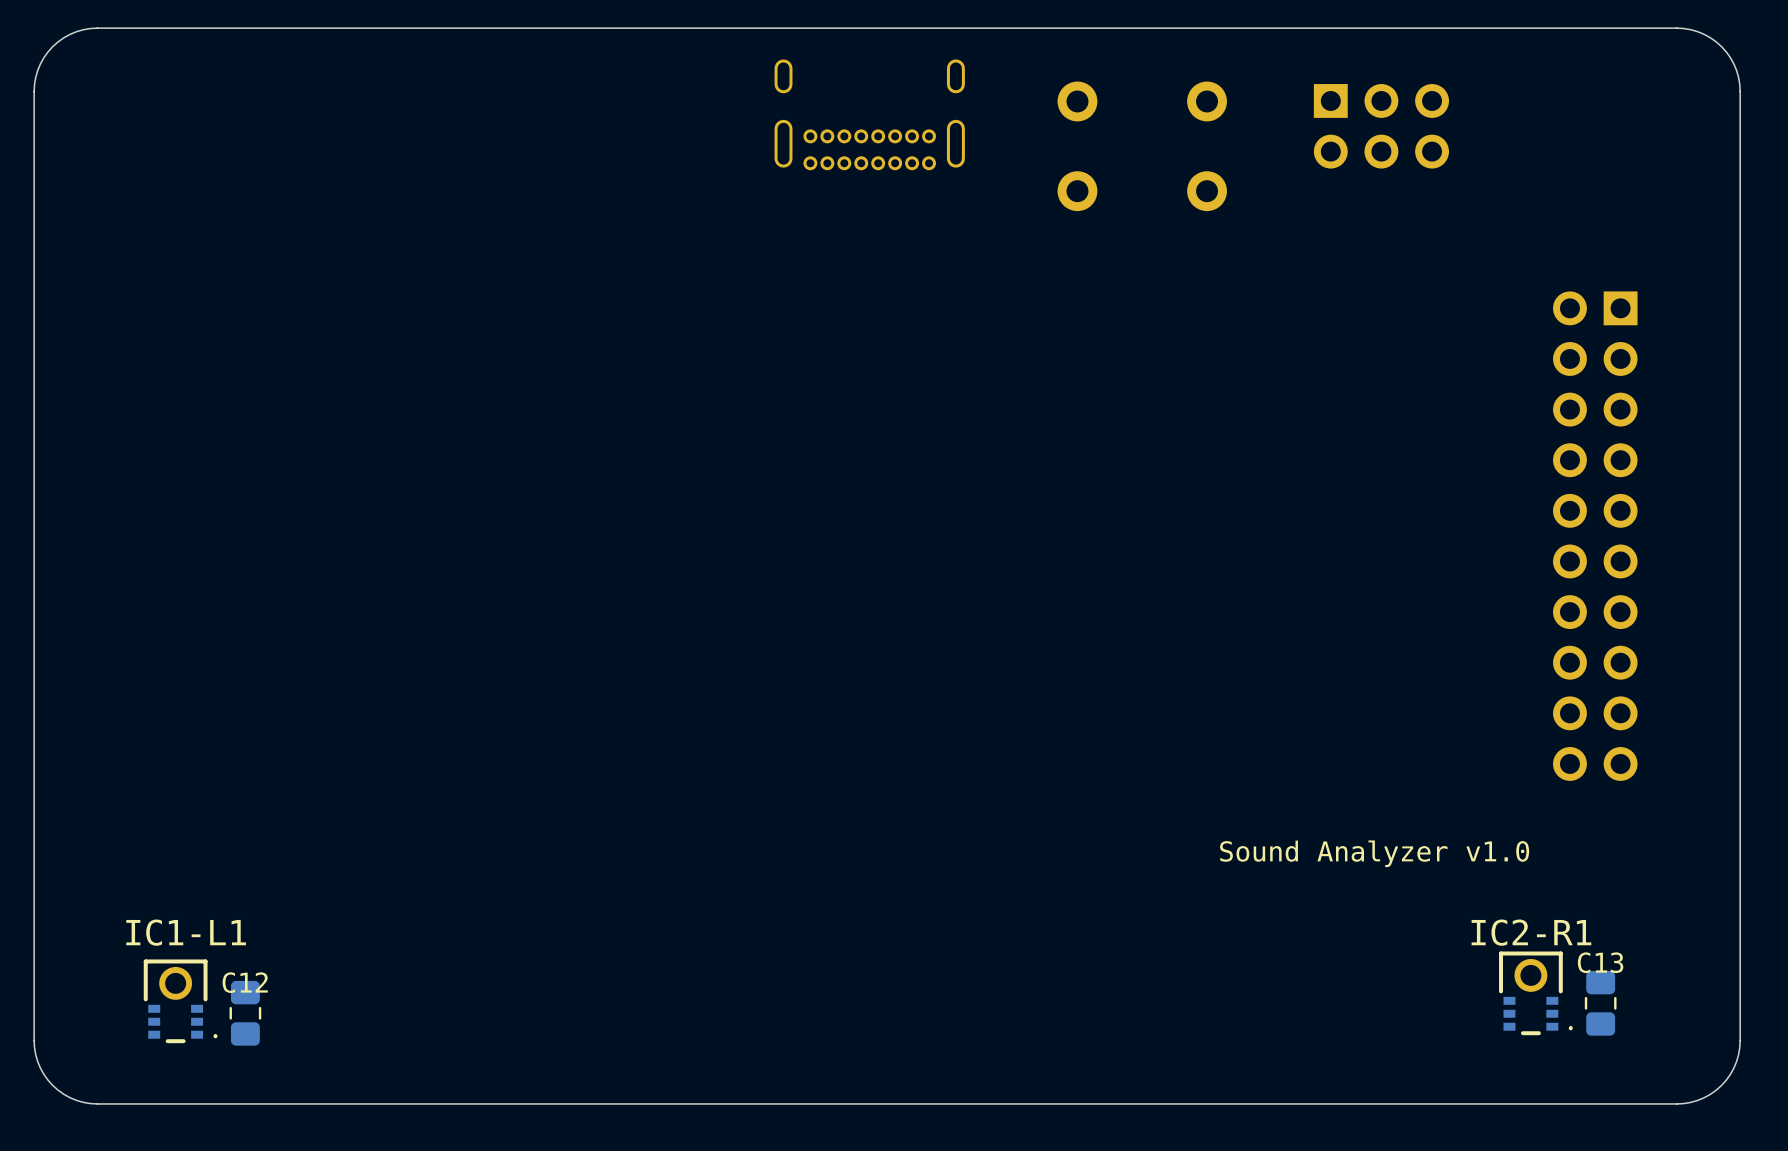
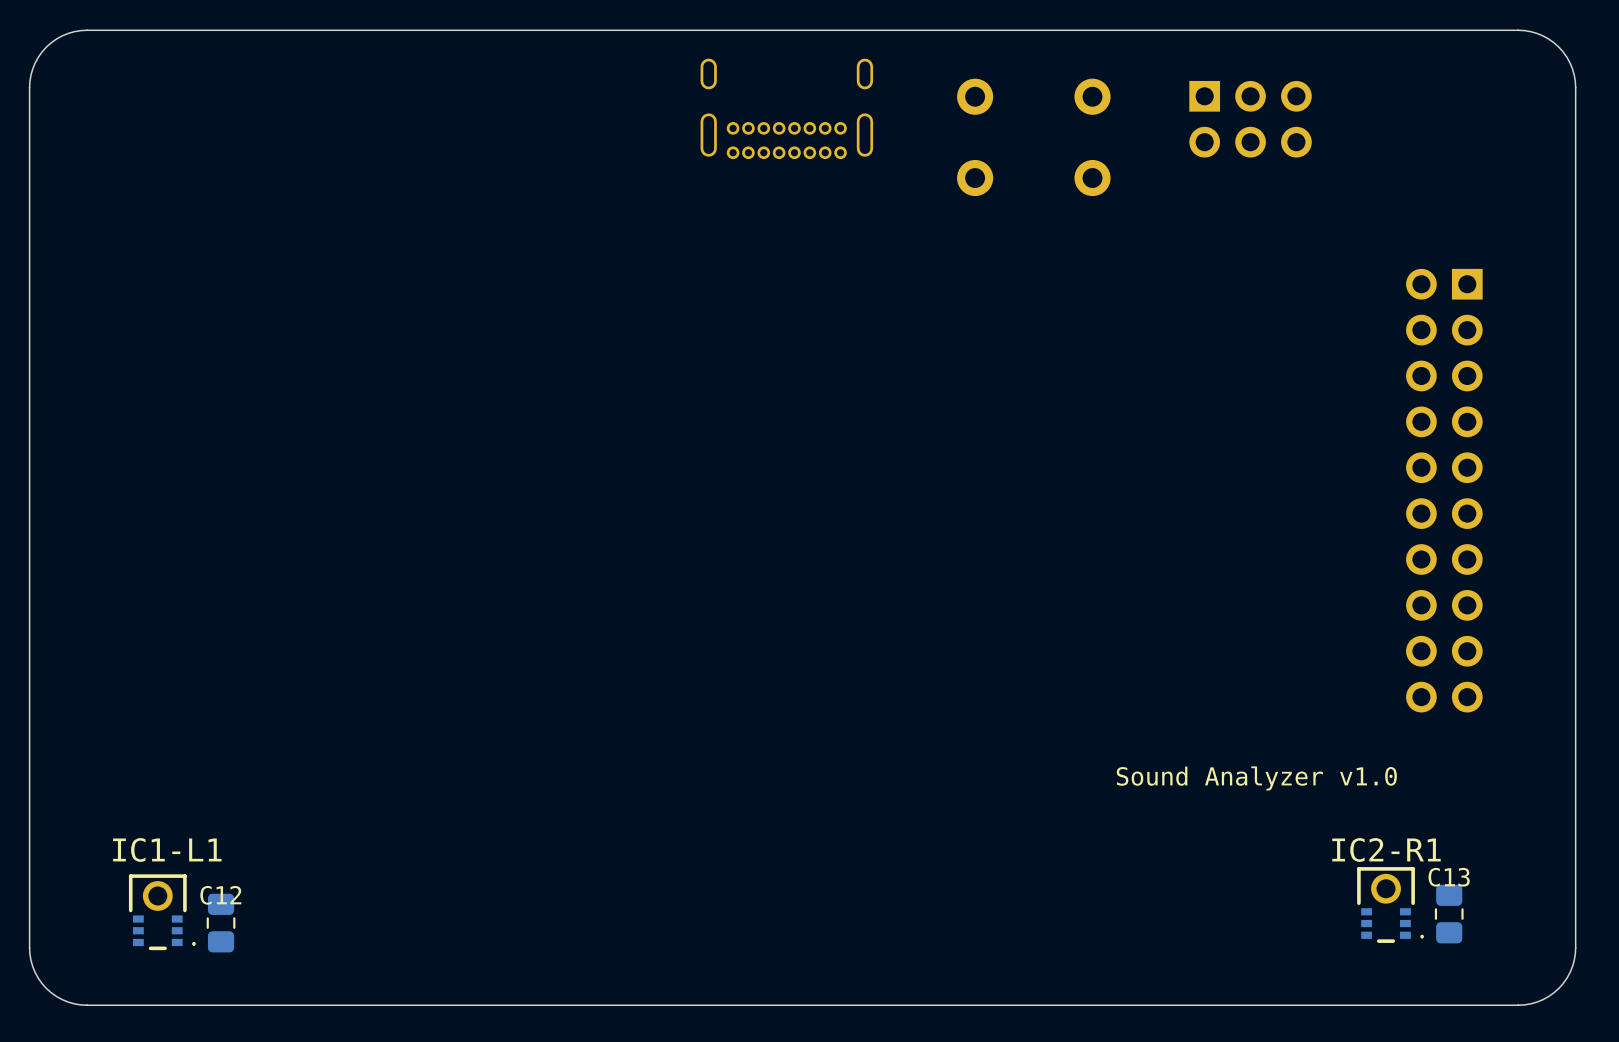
text position: Sound Analyzer v1.0 (1374, 853) -> Sound Analyzer v1.0 (1256, 778)

